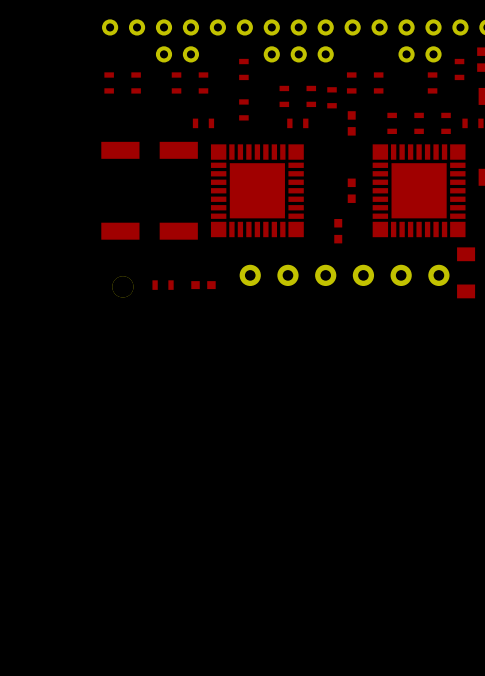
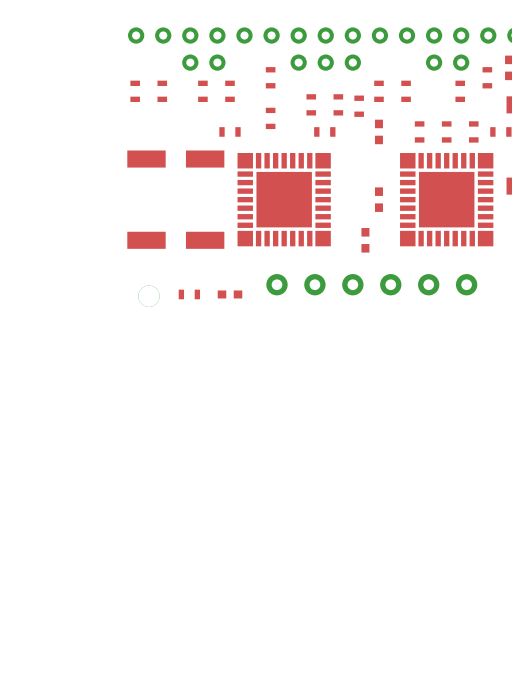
part: (466, 272) -> none

